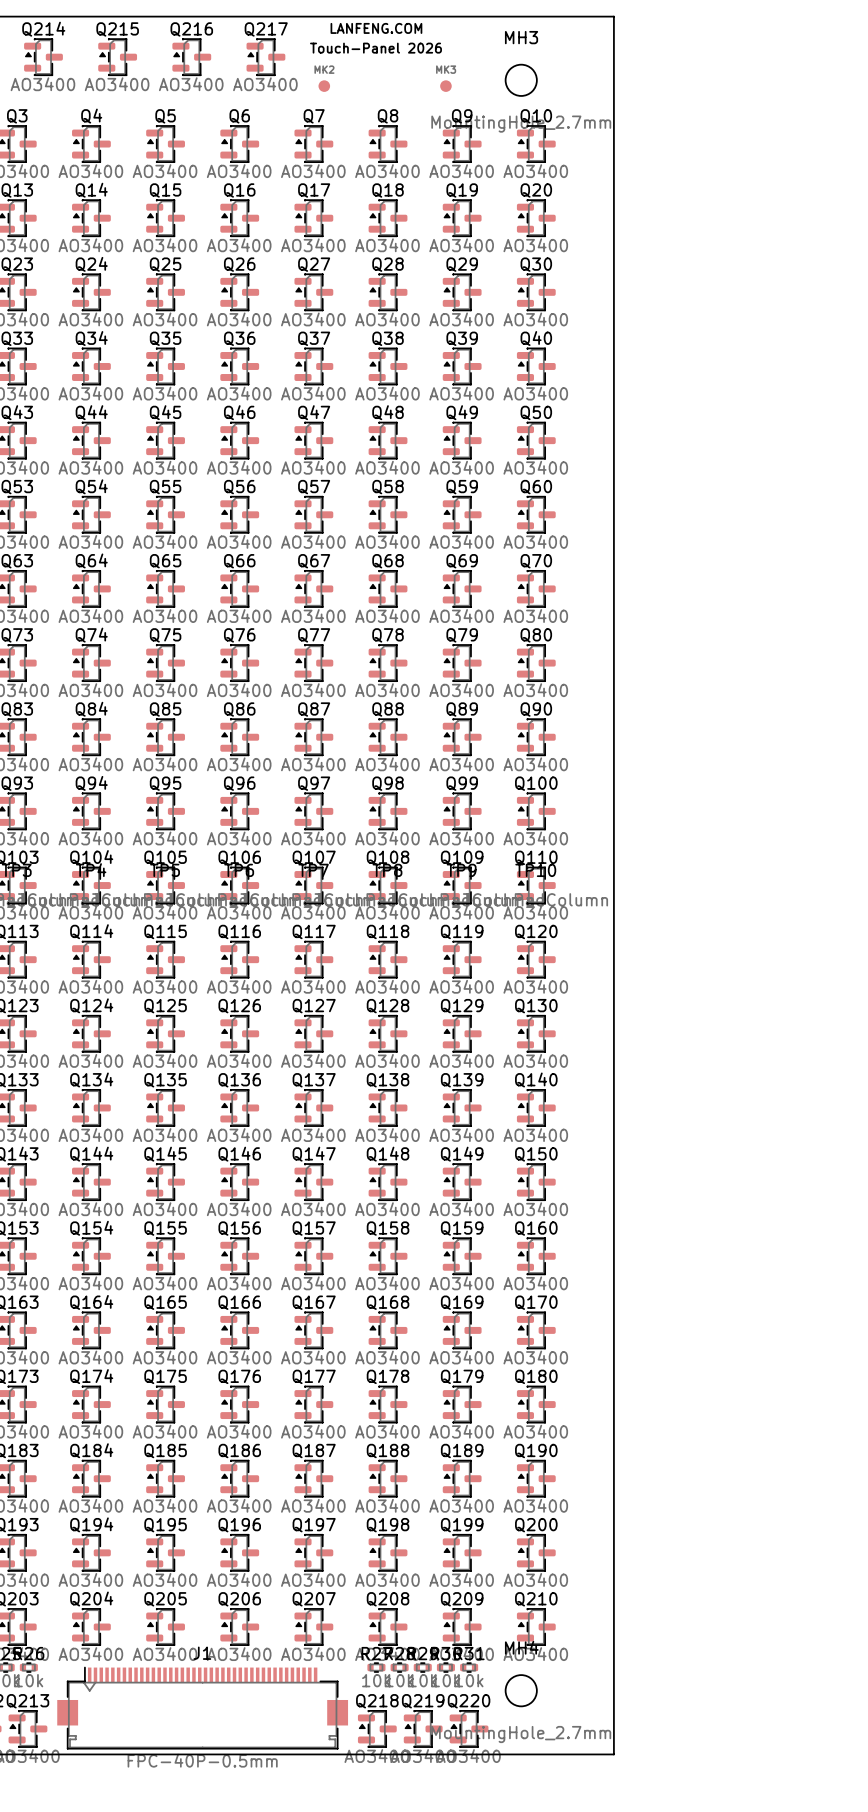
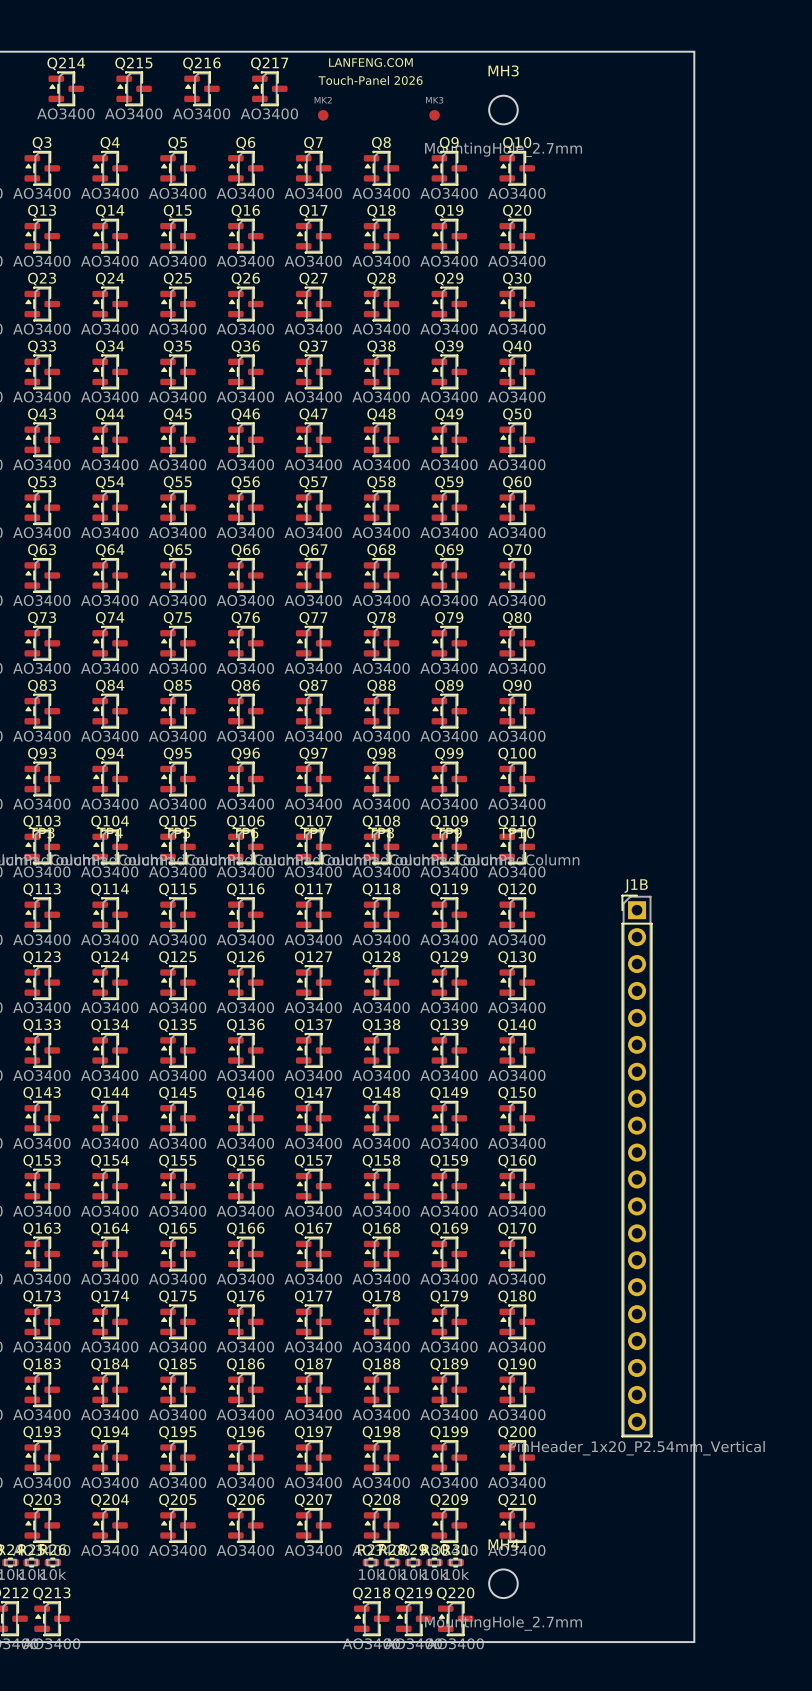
board edge: (613, 16) (613, 1754) -> (588, 51) (694, 51) (694, 1642) (588, 1642)
J1B: none -> PinHeader_1x20_P2.54mm_Vertical (637, 1166)
J1: FPC-40P-0.5mm (202, 1708) -> none

